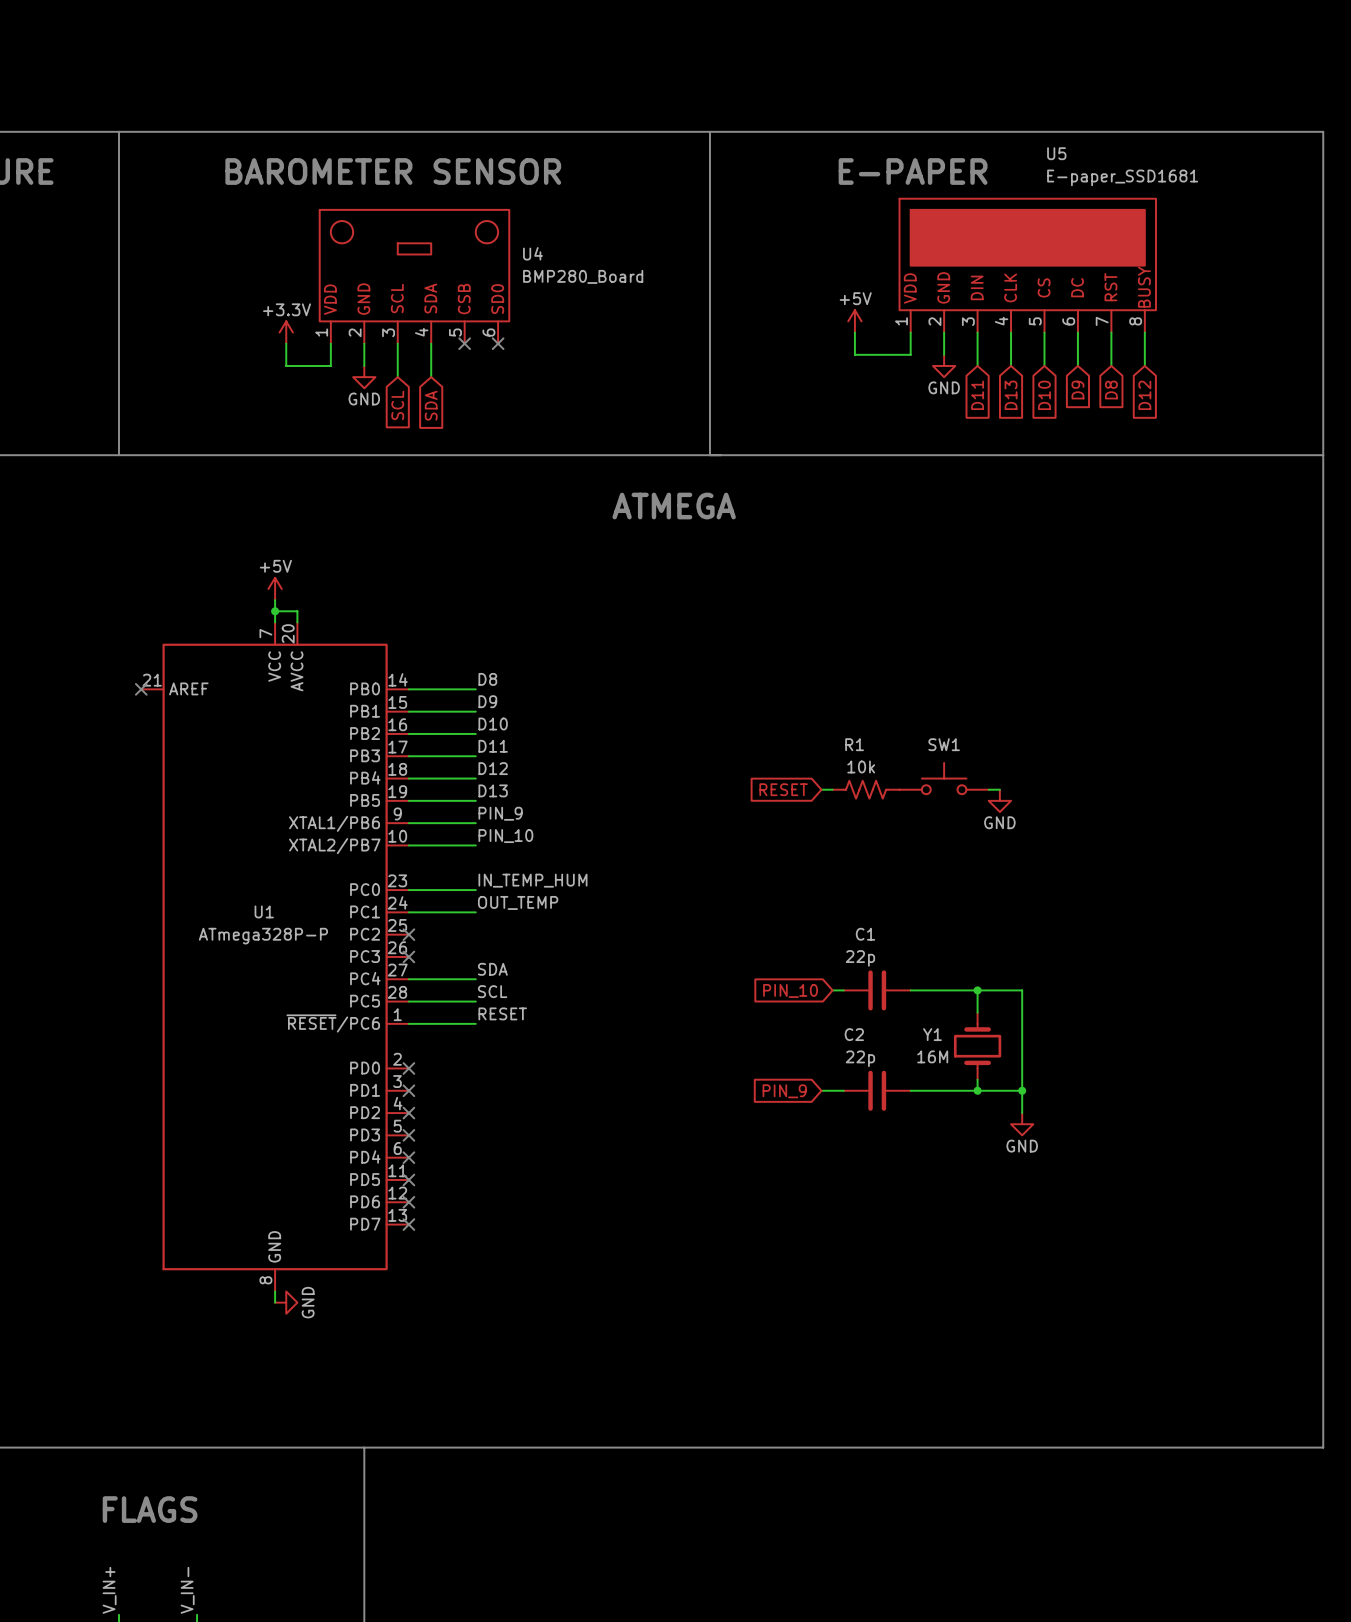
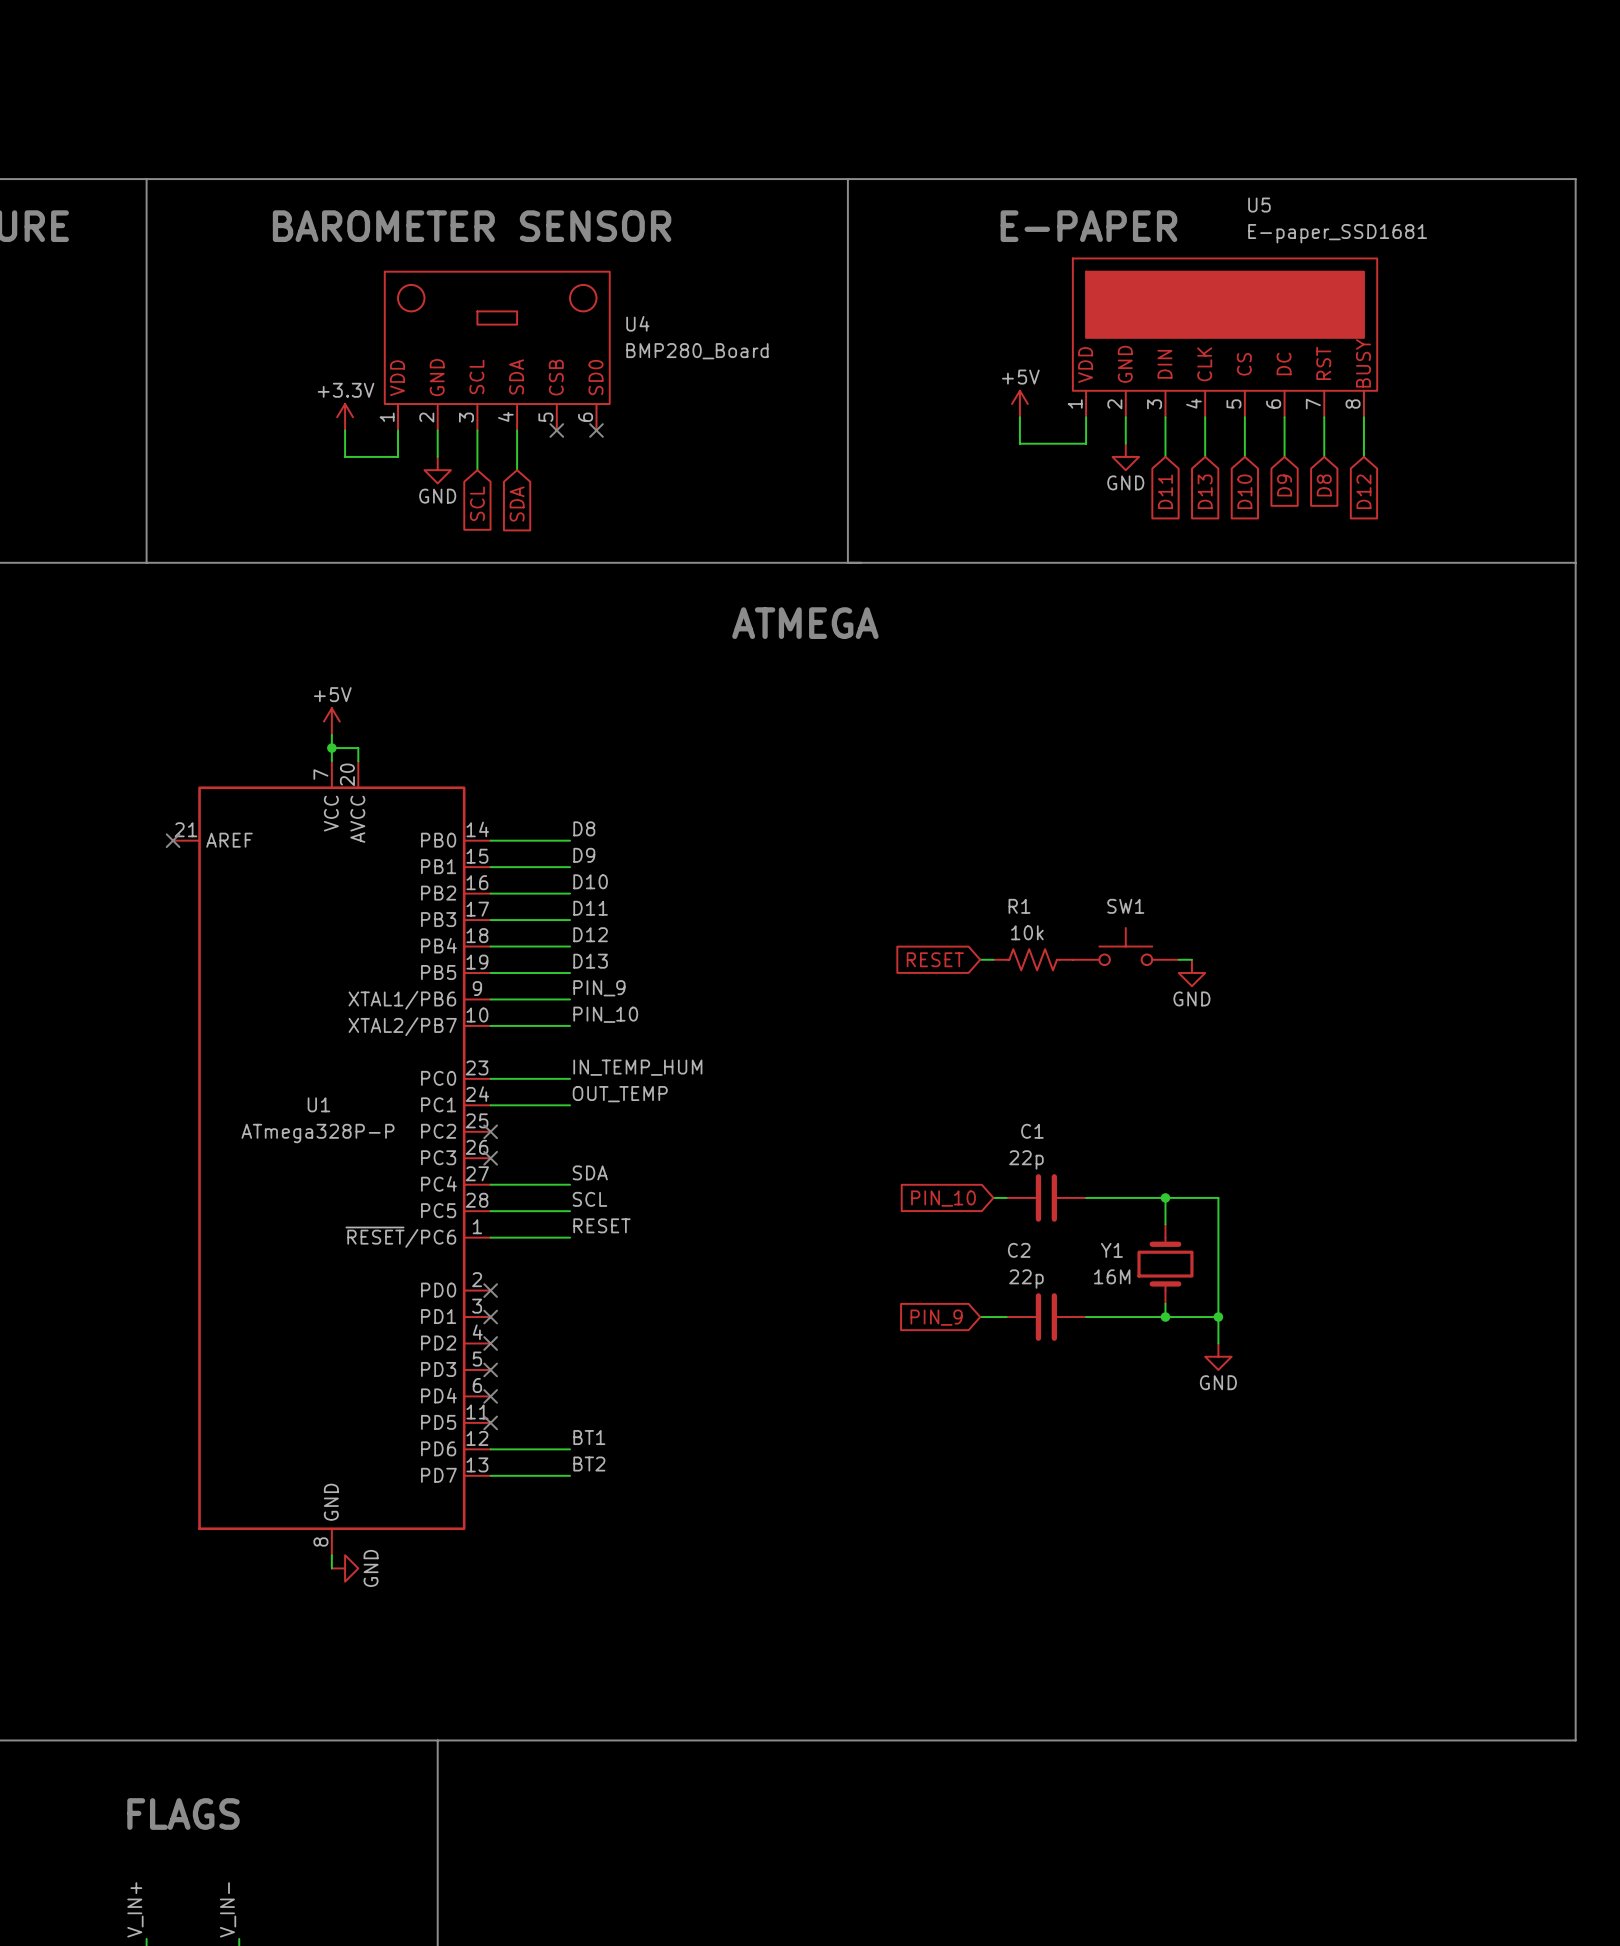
label: none -> BT1 (589, 1437)
wire: none -> (490, 1449) (570, 1449)
no-connect mark: (408, 1202) -> none
label: none -> BT2 (589, 1464)
wire: none -> (490, 1475) (570, 1475)
no-connect mark: (408, 1224) -> none

